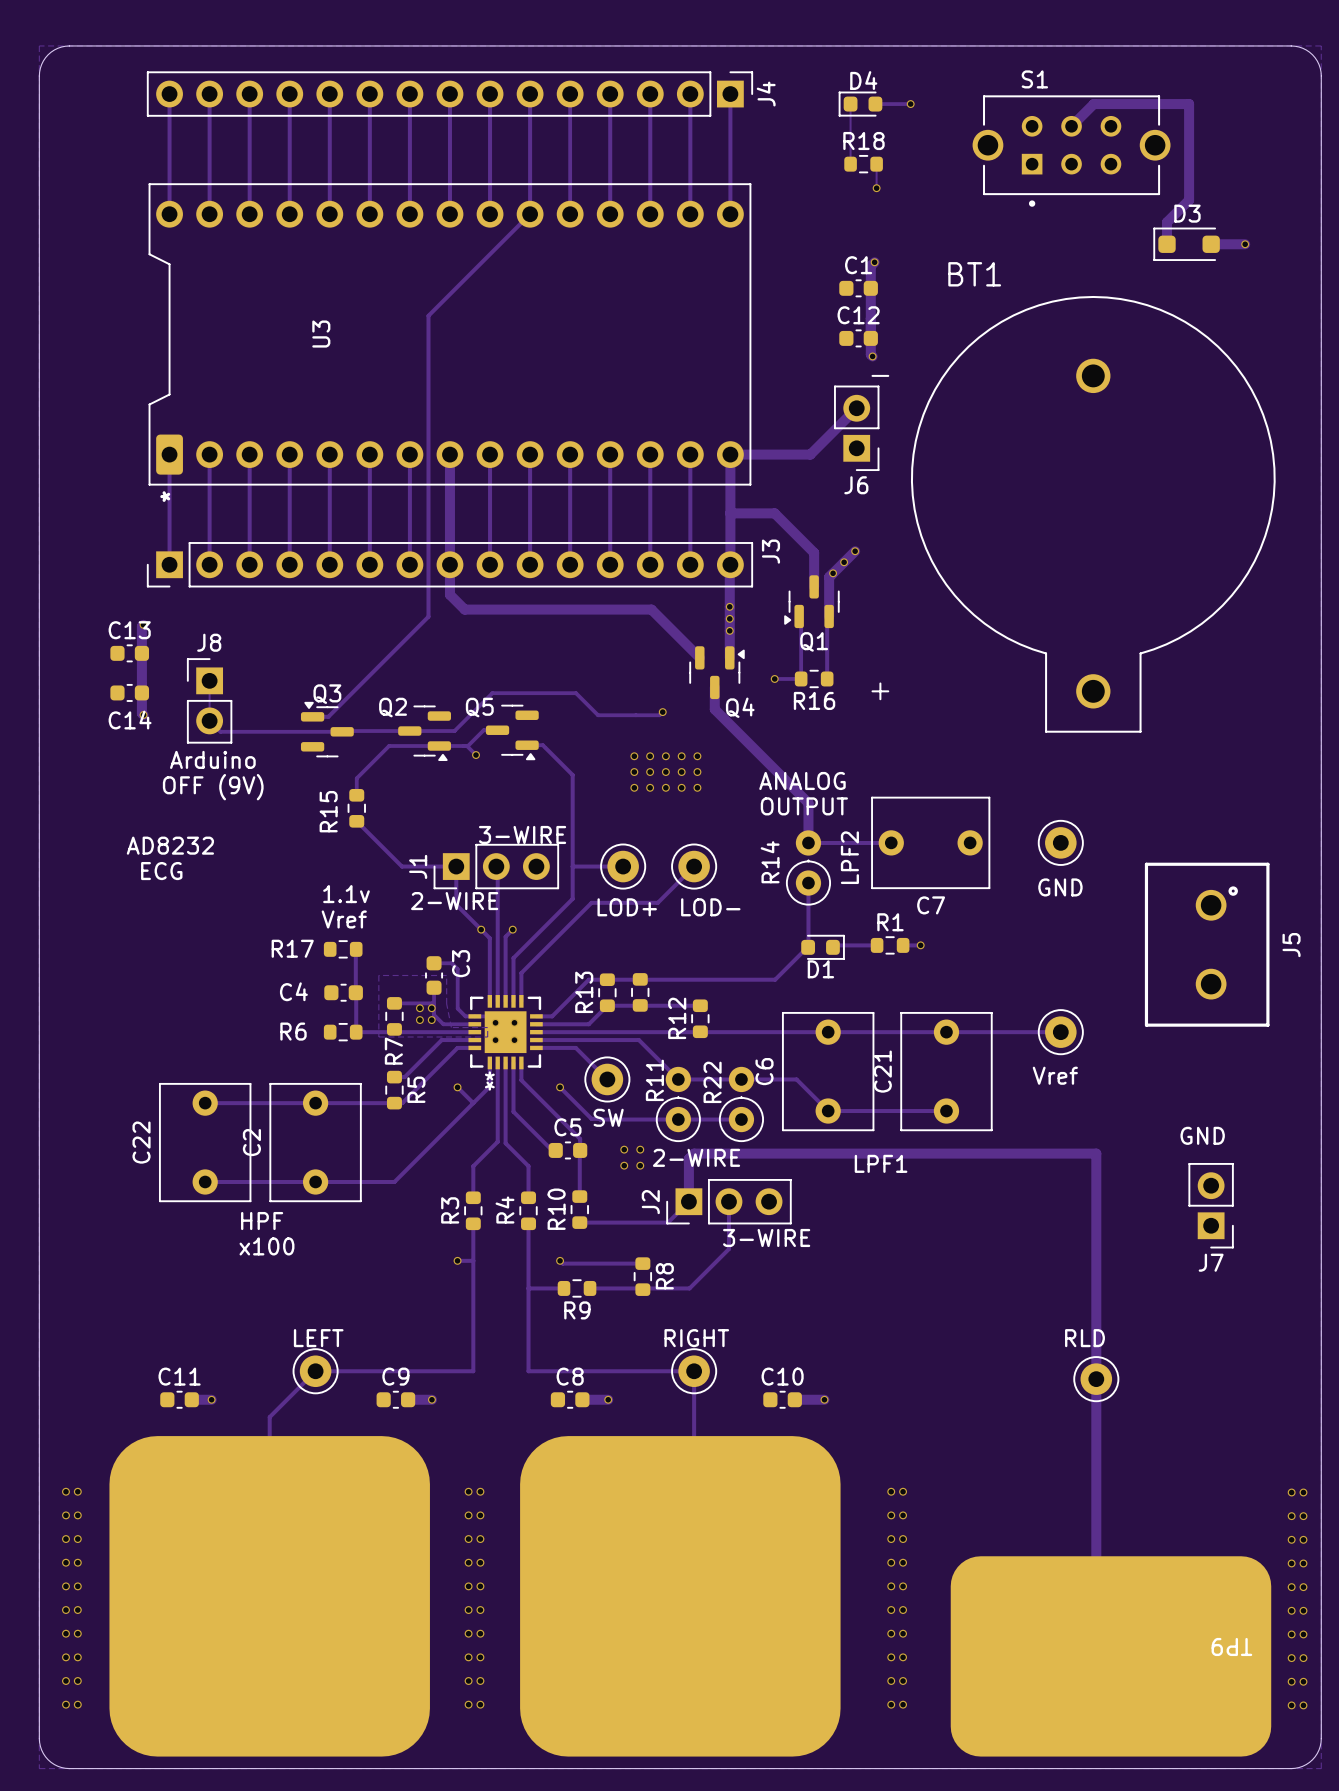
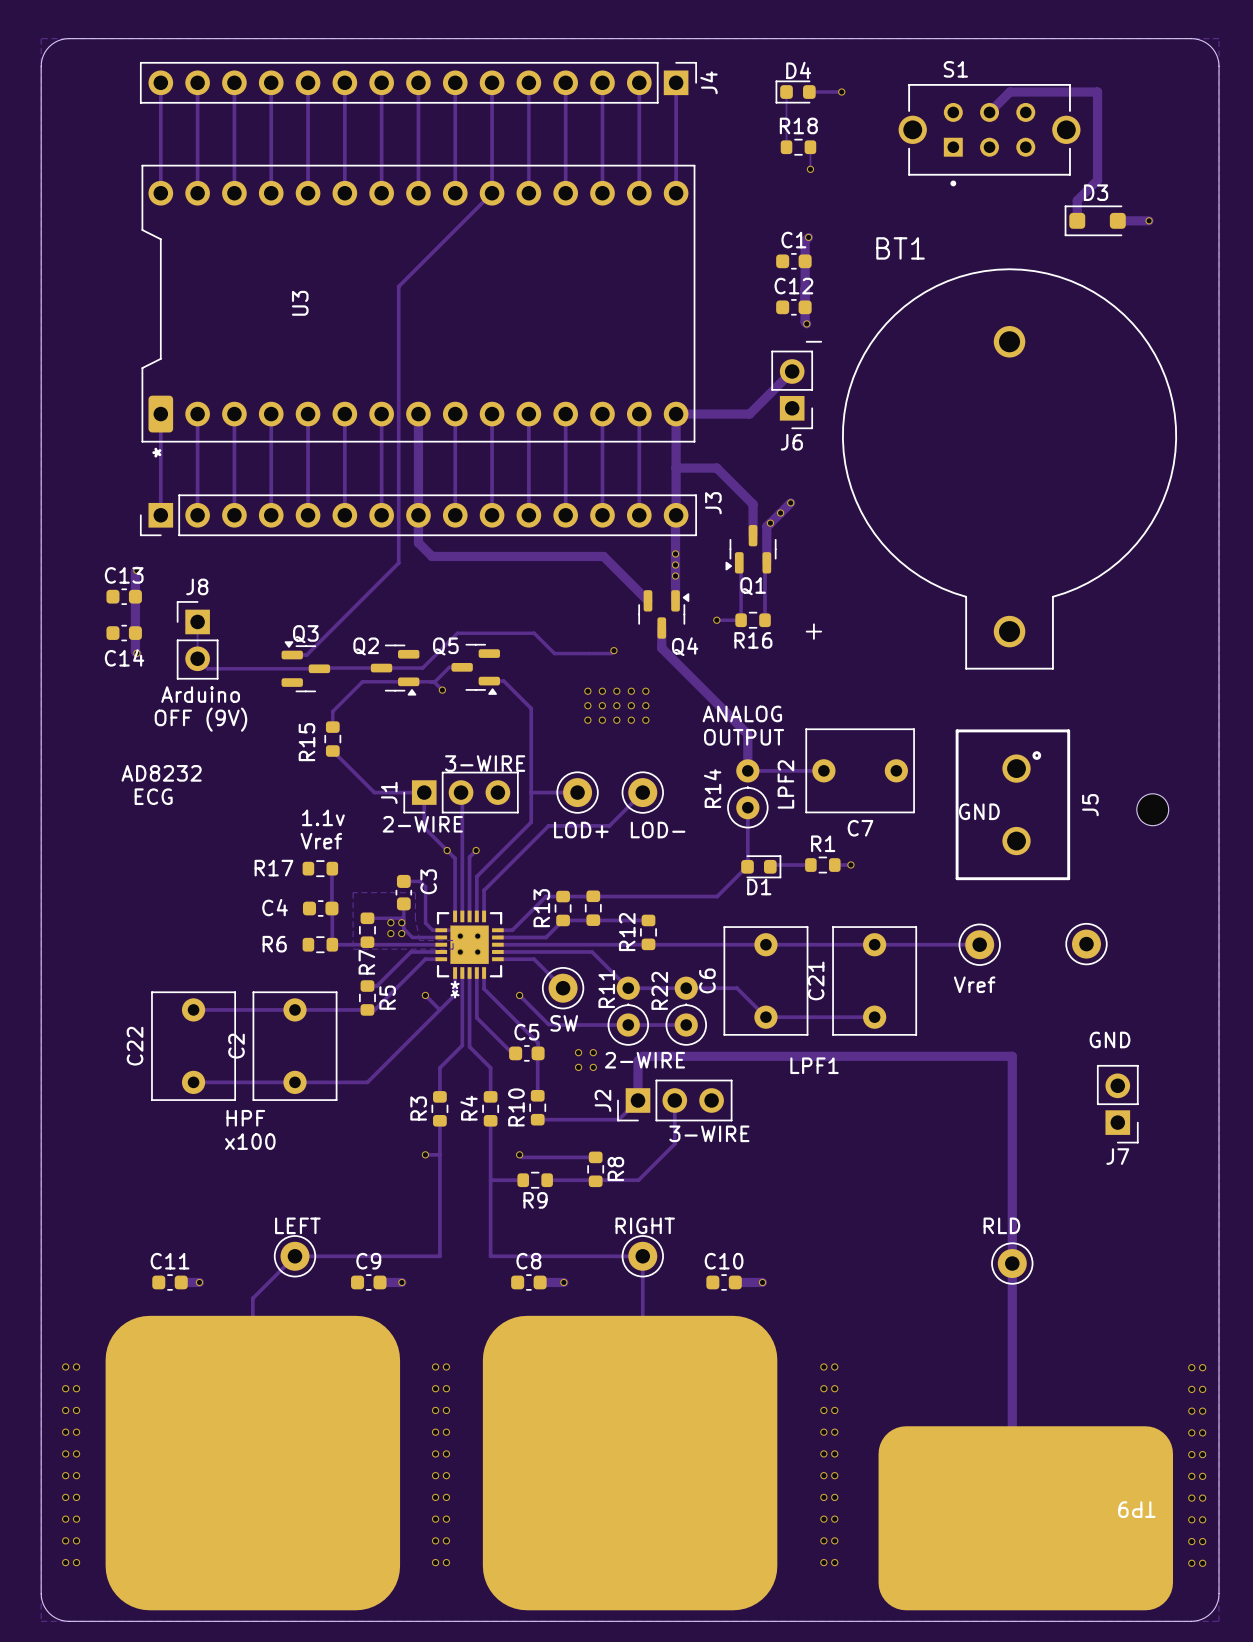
part position: (1060, 842) -> (1086, 944)
part: none -> (1152, 809)
J5 position: (1207, 944) -> (1012, 804)

